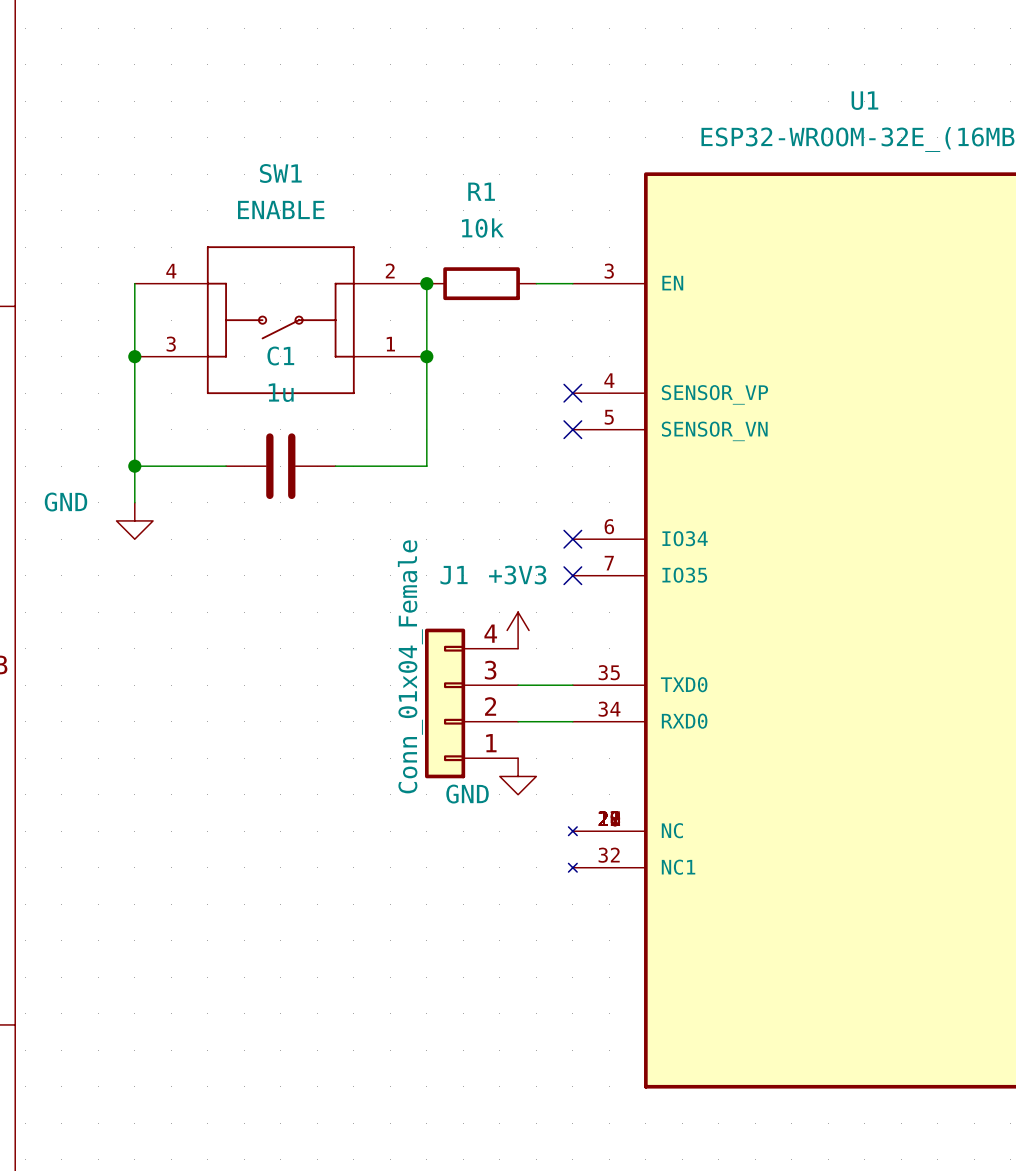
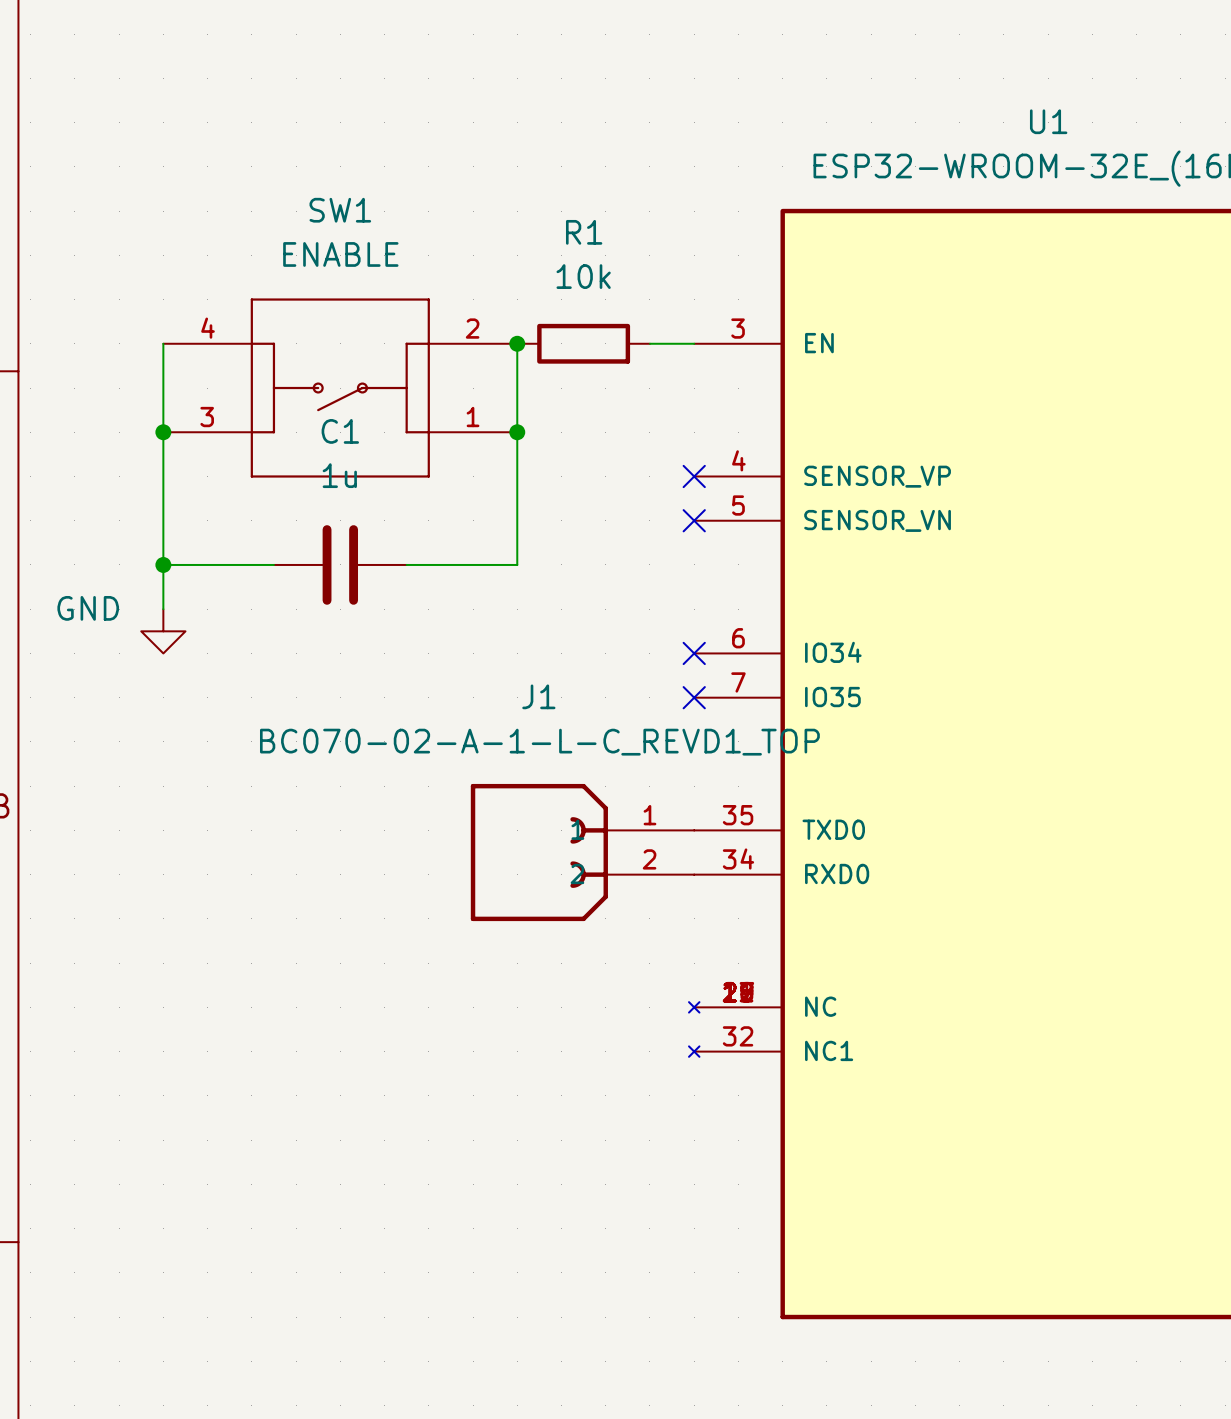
J1 symbol: [425, 628, 519, 779] -> [470, 783, 695, 922]
power symbol: +3V3 (518, 630) -> none
J1 value: Conn_01x04_Female (410, 666) -> BC070-02-A-1-L-C_REVD1_TOP (539, 742)
power symbol: GND (518, 776) -> none

